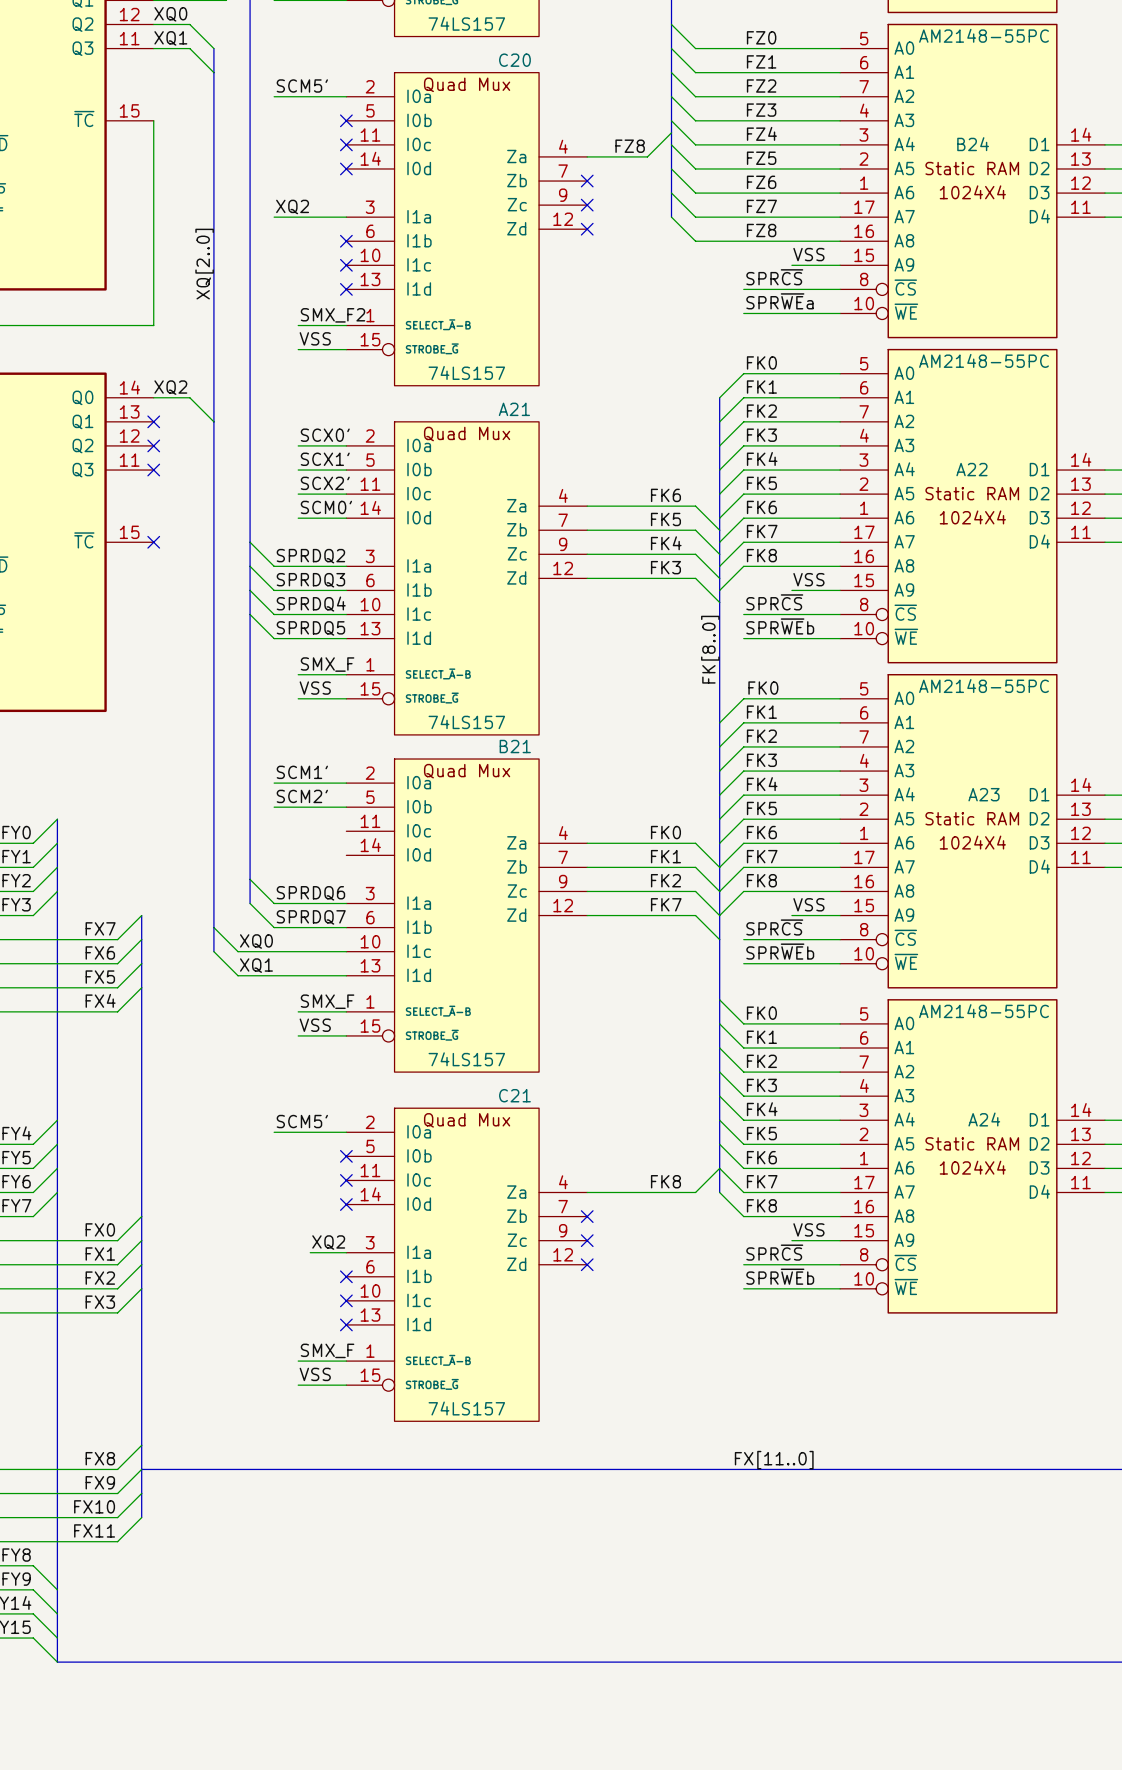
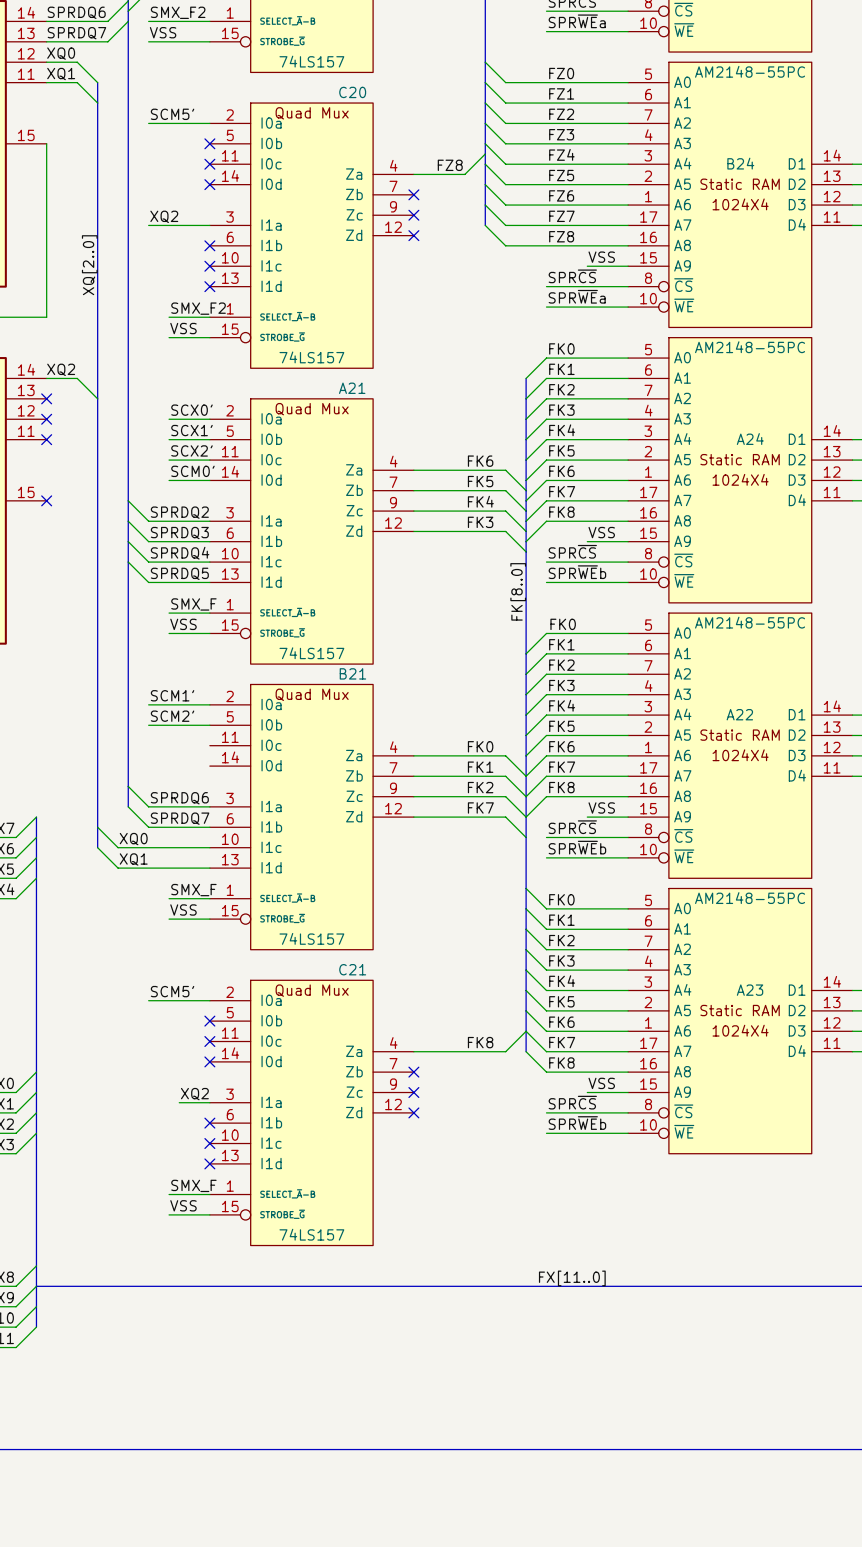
A22 name: A22 (971, 469) -> A24 (750, 439)
A23 name: A23 (984, 794) -> A22 (739, 714)
A24 name: A24 (984, 1119) -> A23 (750, 990)

